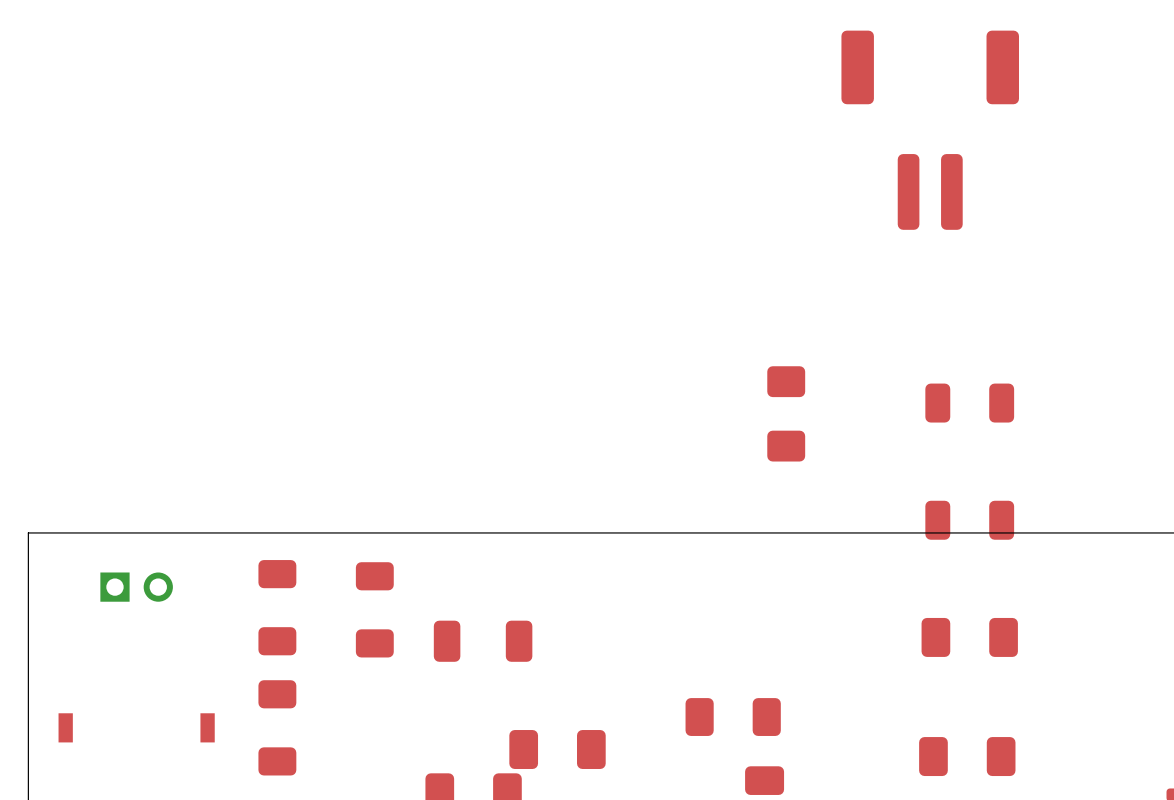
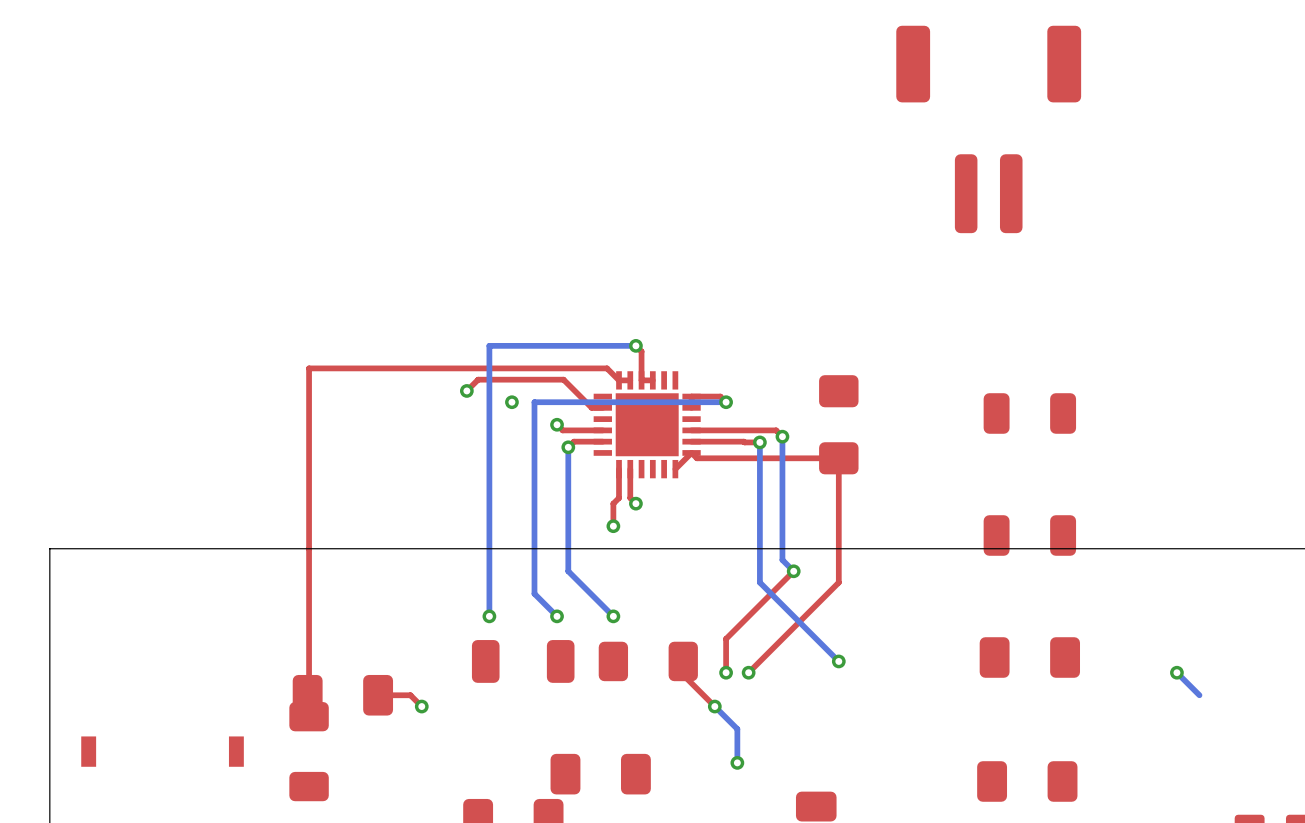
top track: none -> (635, 345) (641, 351) (641, 380) (652, 380)
bottom track: none -> (635, 345) (489, 345) (489, 616)
via: none -> (635, 345)
top track: none -> (630, 380) (619, 380) (607, 368) (309, 368) (307, 695)
top track: none -> (466, 390) (478, 379) (563, 379) (591, 407) (602, 407)
via: none -> (466, 390)
via: none -> (511, 402)
top track: none -> (726, 402) (720, 396) (691, 396) (691, 407)
bottom track: none -> (726, 402) (534, 402) (534, 593) (557, 616)
via: none -> (726, 402)
top track: none -> (557, 424) (562, 430) (602, 430)
via: none -> (557, 424)
part: none -> (647, 424)
top track: none -> (691, 430) (776, 430) (782, 436)
bottom track: none -> (782, 436) (782, 560) (793, 571)
via: none -> (782, 436)
top track: none -> (602, 441) (573, 441) (568, 447)
top track: none -> (691, 441) (759, 442)
bottom track: none -> (759, 442) (759, 582) (838, 661)
via: none -> (759, 442)
bottom track: none -> (568, 447) (568, 571) (613, 616)
via: none -> (568, 447)
top track: none -> (619, 469) (619, 498) (613, 503) (613, 526)
top track: none -> (630, 469) (630, 498) (635, 503)
top track: none -> (675, 469) (691, 452) (696, 458) (838, 458) (838, 582) (748, 672)
via: none -> (635, 503)
via: none -> (613, 526)
top track: none -> (793, 571) (726, 638) (726, 672)
via: none -> (793, 571)
part: (136, 587) -> none
via: none -> (489, 616)
via: none -> (557, 616)
via: none -> (613, 616)
part: (277, 607) -> none
part: (374, 609) -> none
part: none -> (648, 661)
top track: none -> (683, 661) (683, 674) (714, 706)
via: none -> (838, 661)
via: none -> (726, 672)
via: none -> (748, 672)
bottom track: none -> (1176, 672) (1199, 695)
via: none -> (1176, 672)
part: none -> (342, 695)
top track: none -> (378, 695) (410, 695) (421, 706)
via: none -> (421, 706)
bottom track: none -> (714, 706) (737, 729) (737, 762)
via: none -> (714, 706)
part: (733, 717) -> none
via: none -> (737, 762)

